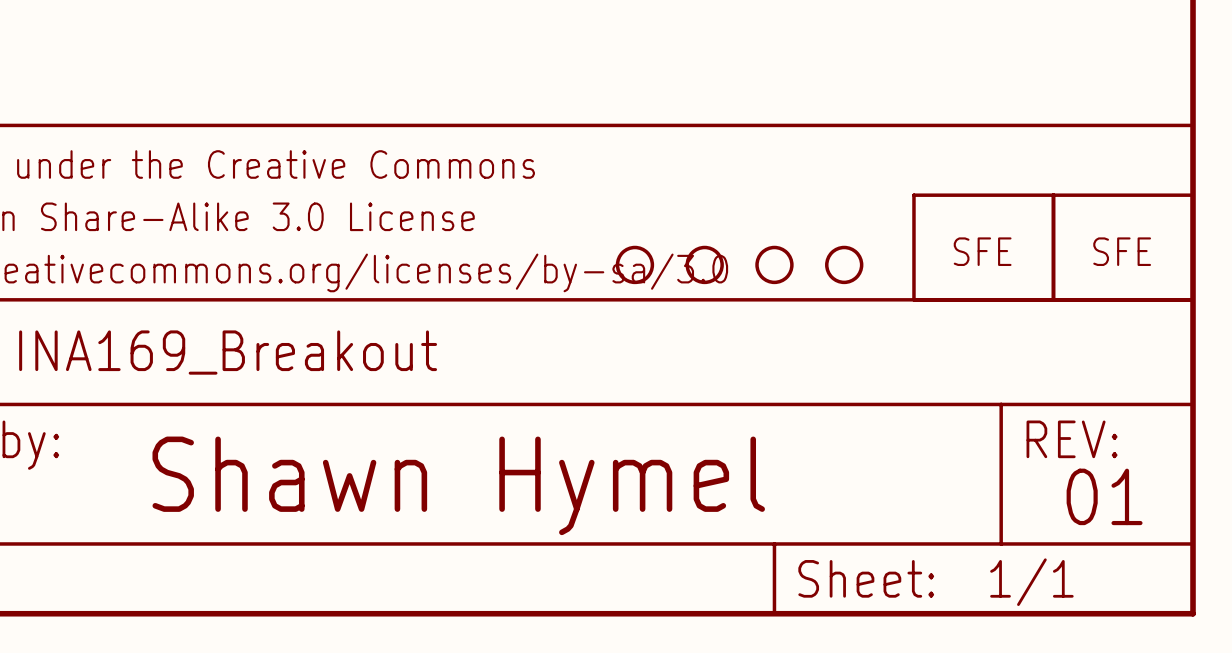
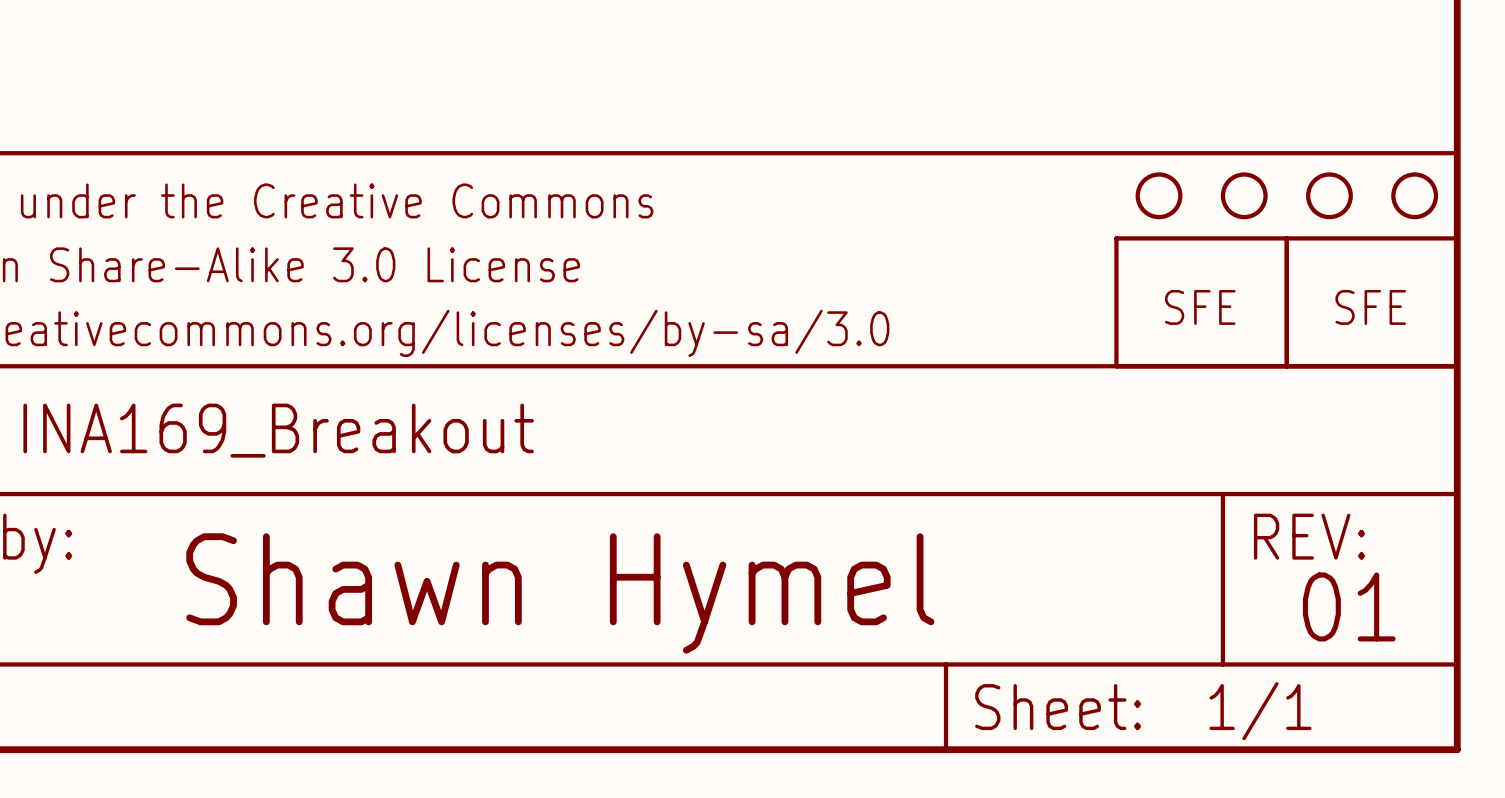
part: none -> (1159, 195)
part: none -> (1244, 195)
part: none -> (1329, 195)
part: none -> (1414, 195)
part: (634, 264) -> none
part: (704, 264) -> none
part: (774, 264) -> none
part: (844, 264) -> none

